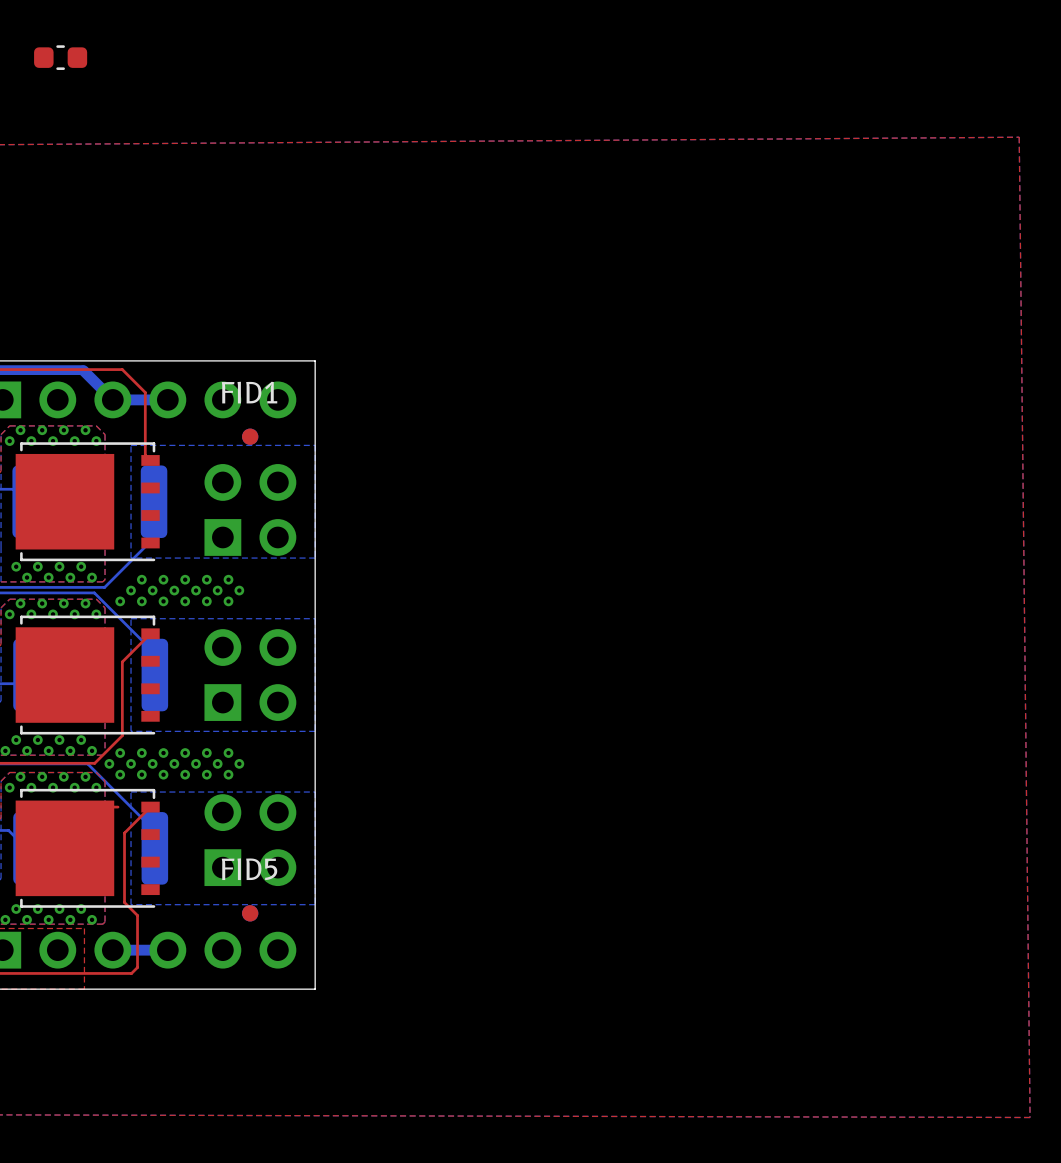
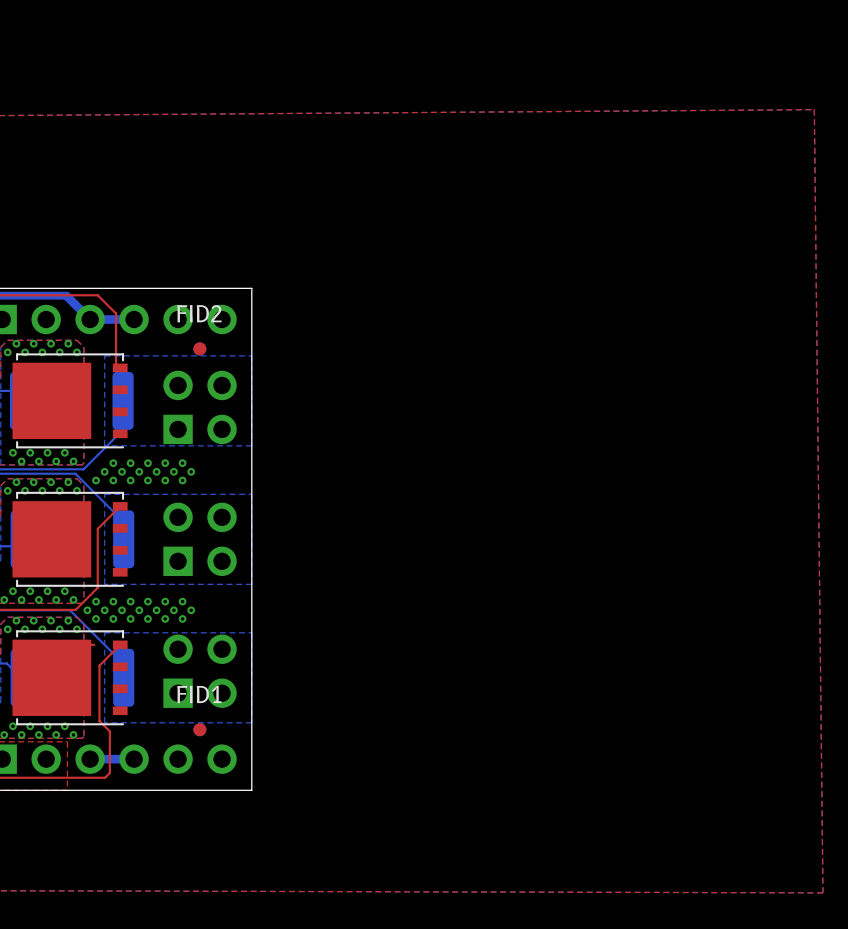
part: (60, 57) -> none
FID1 name: FID1 (249, 392) -> FID2 (199, 313)
FID5 name: FID5 (249, 869) -> FID1 (199, 694)

